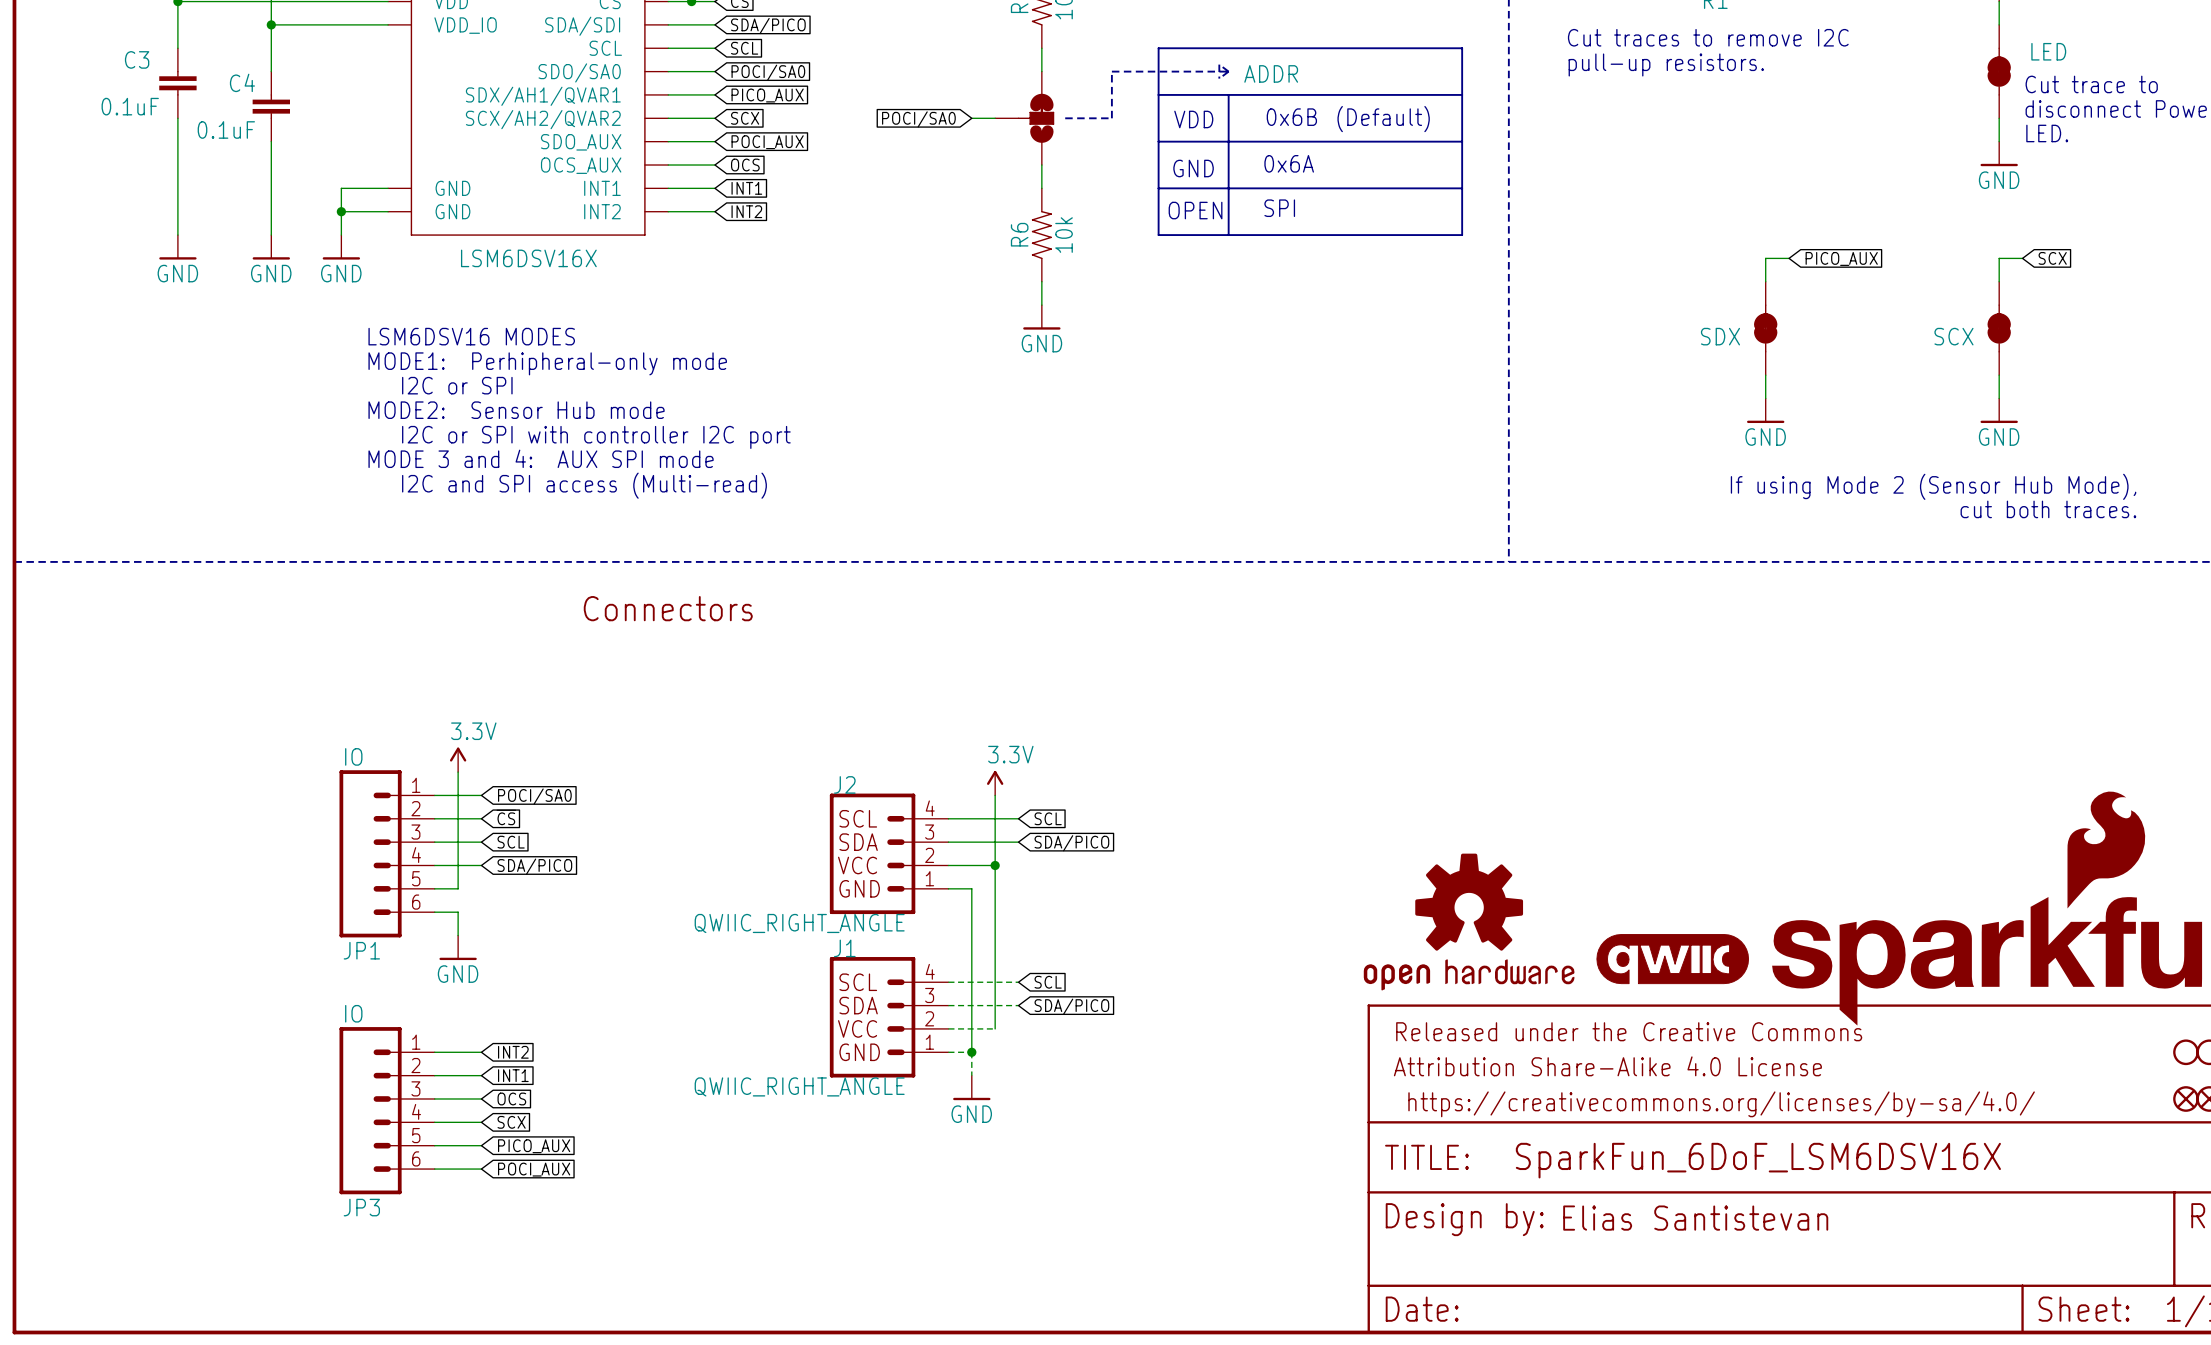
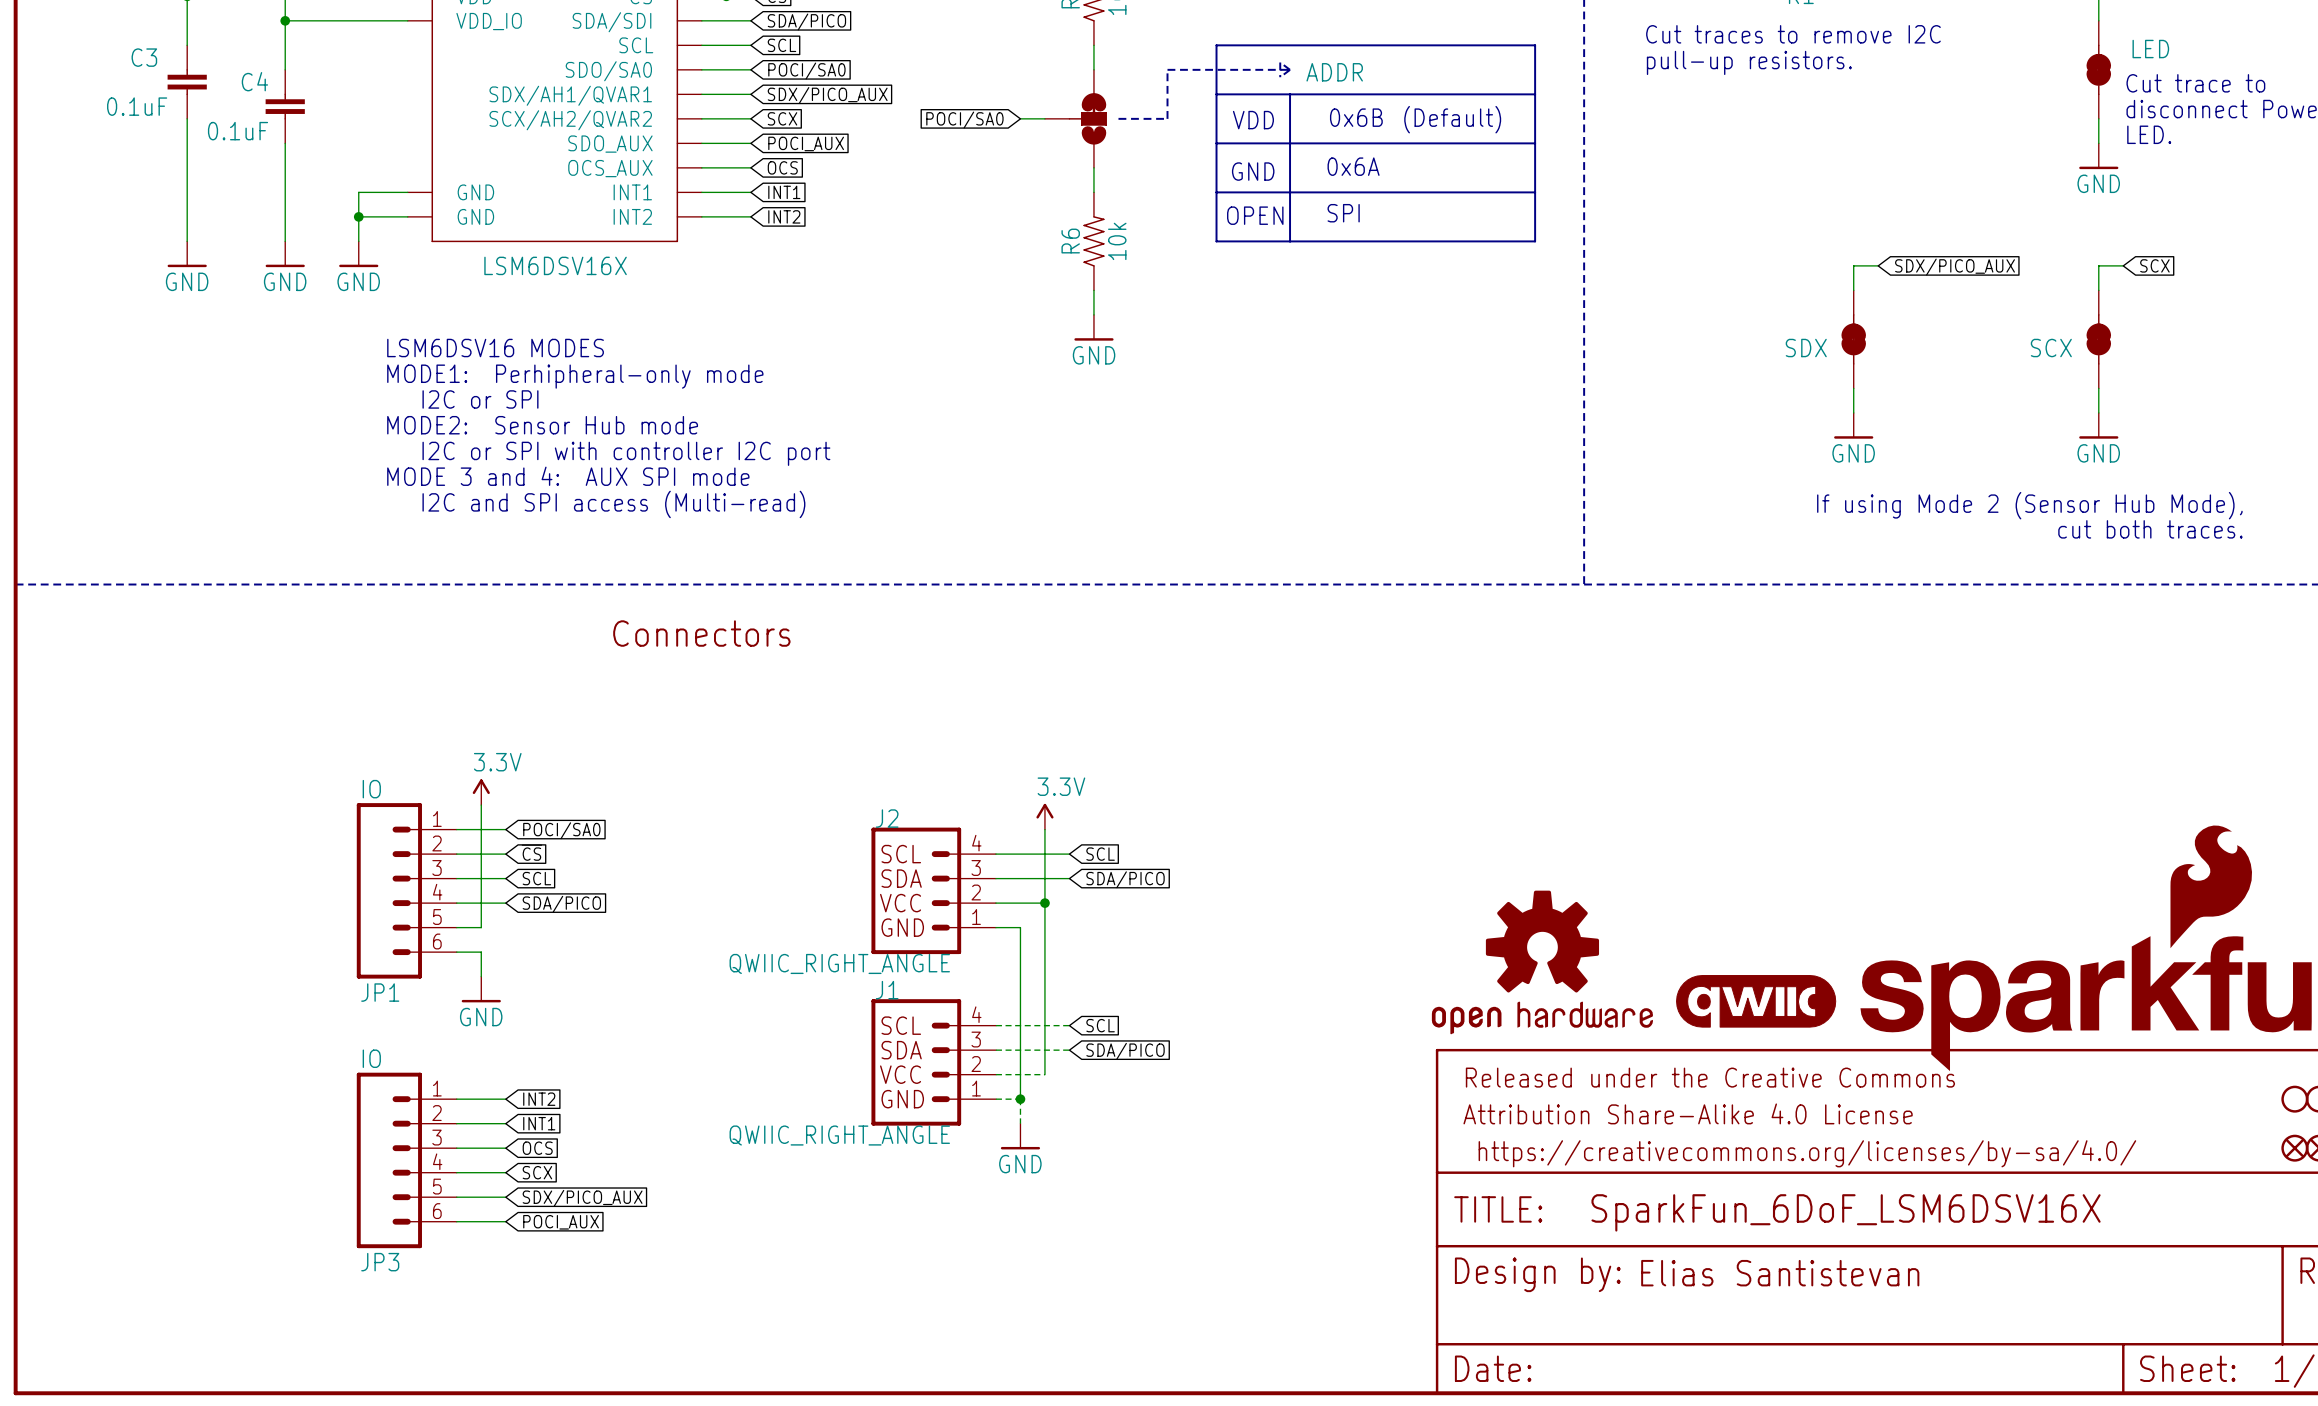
global label: PICO_AUX (767, 95) -> SDX/PICO_AUX (827, 95)
global label: PICO_AUX (1841, 258) -> SDX/PICO_AUX (1955, 267)
global label: PICO_AUX (534, 1146) -> SDX/PICO_AUX (582, 1198)

